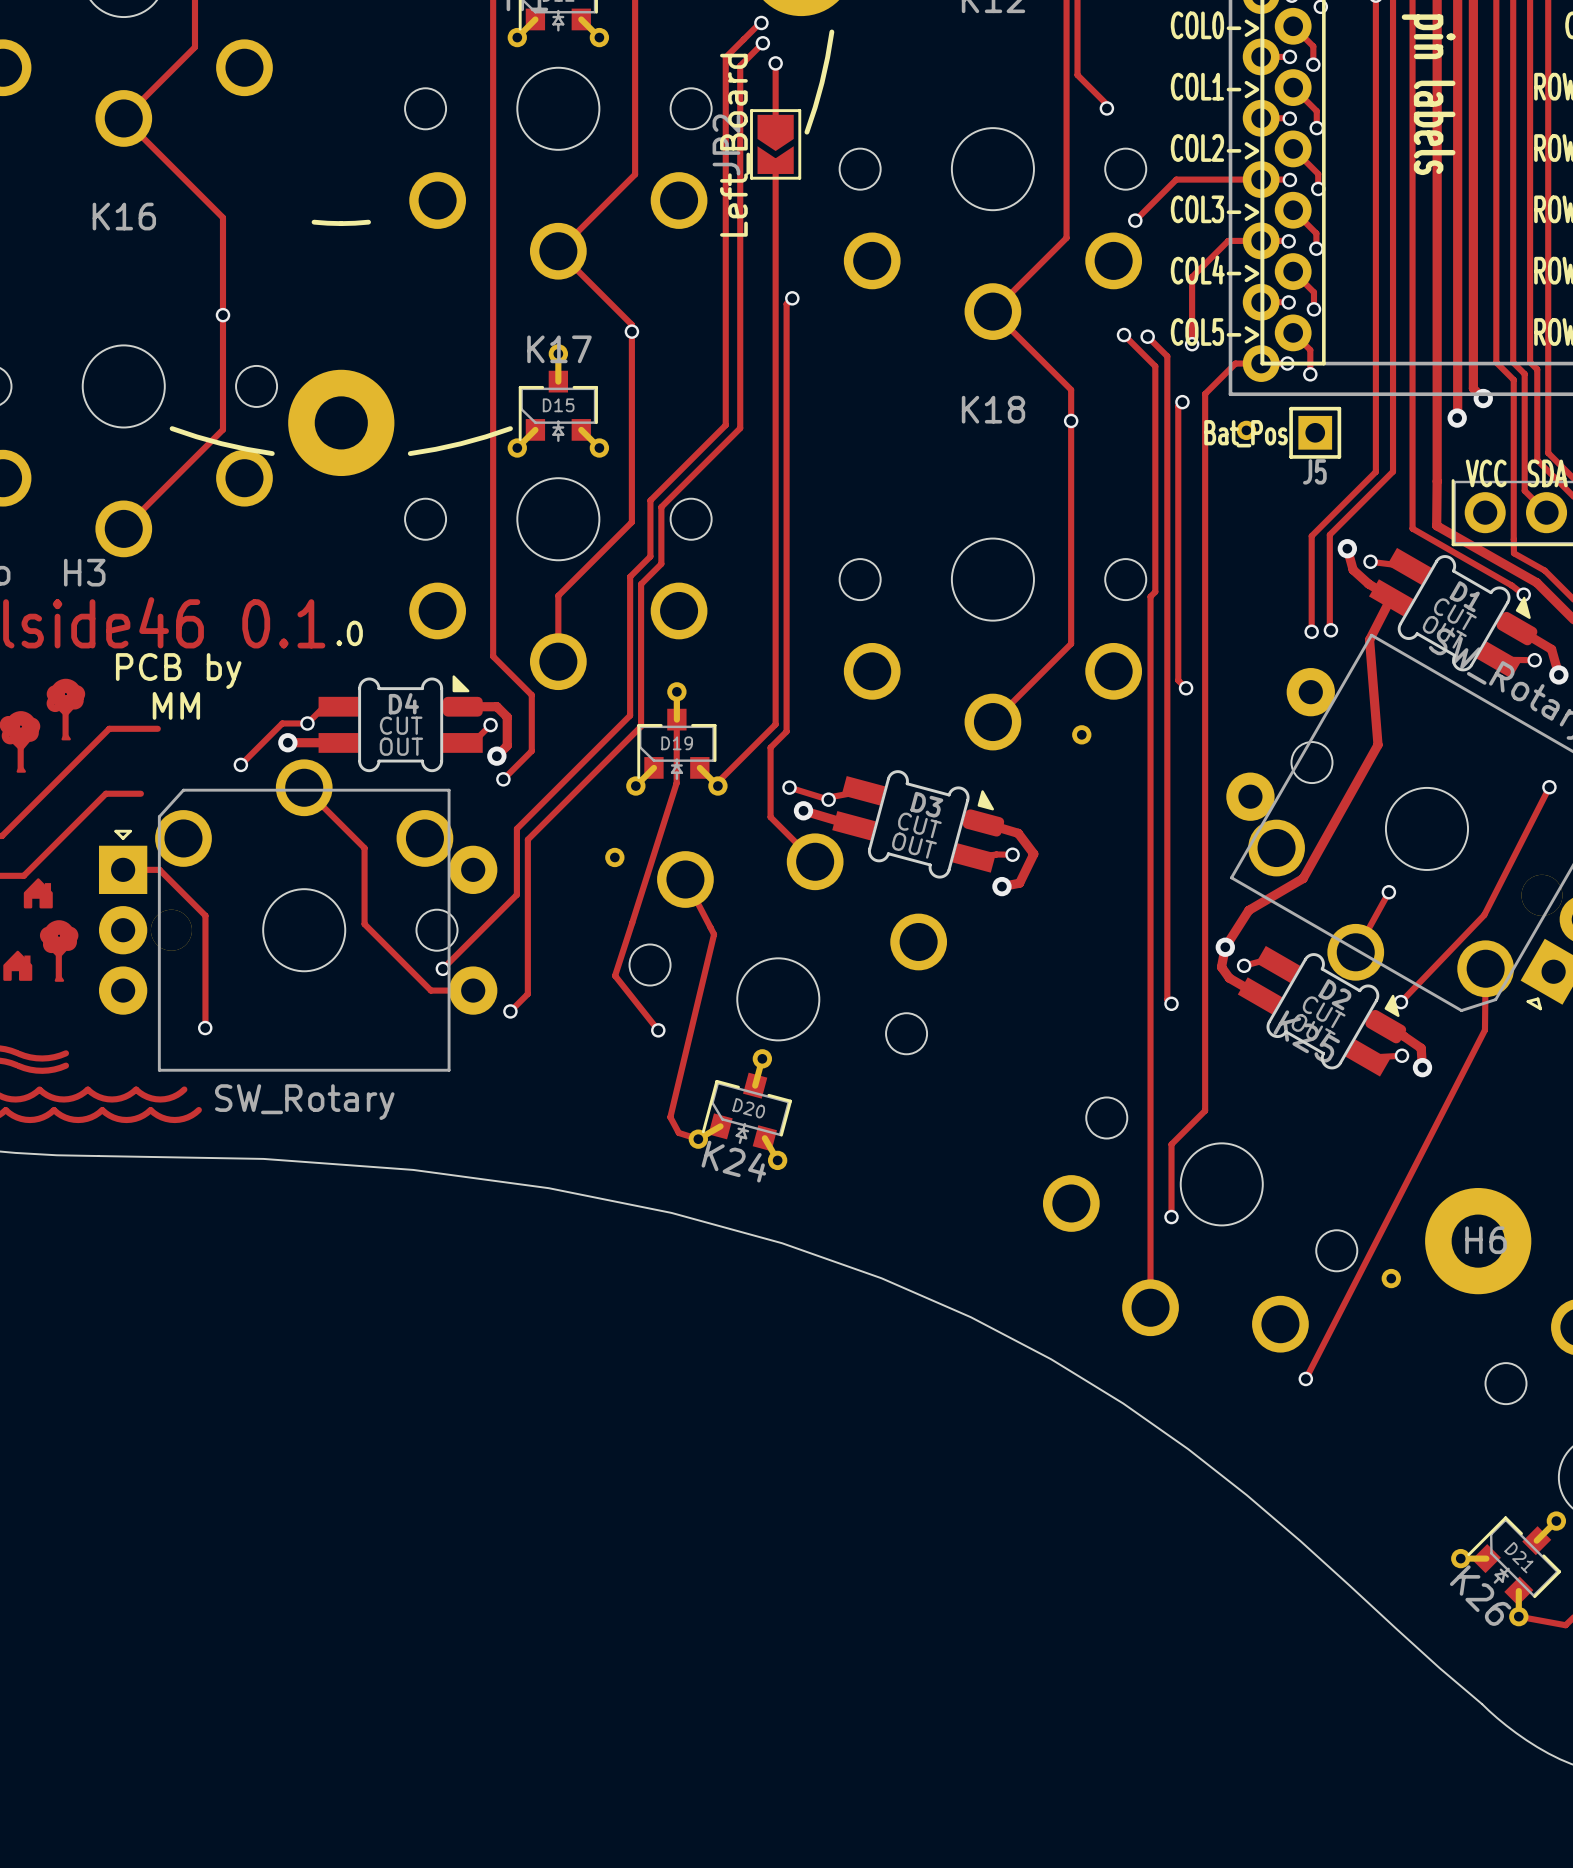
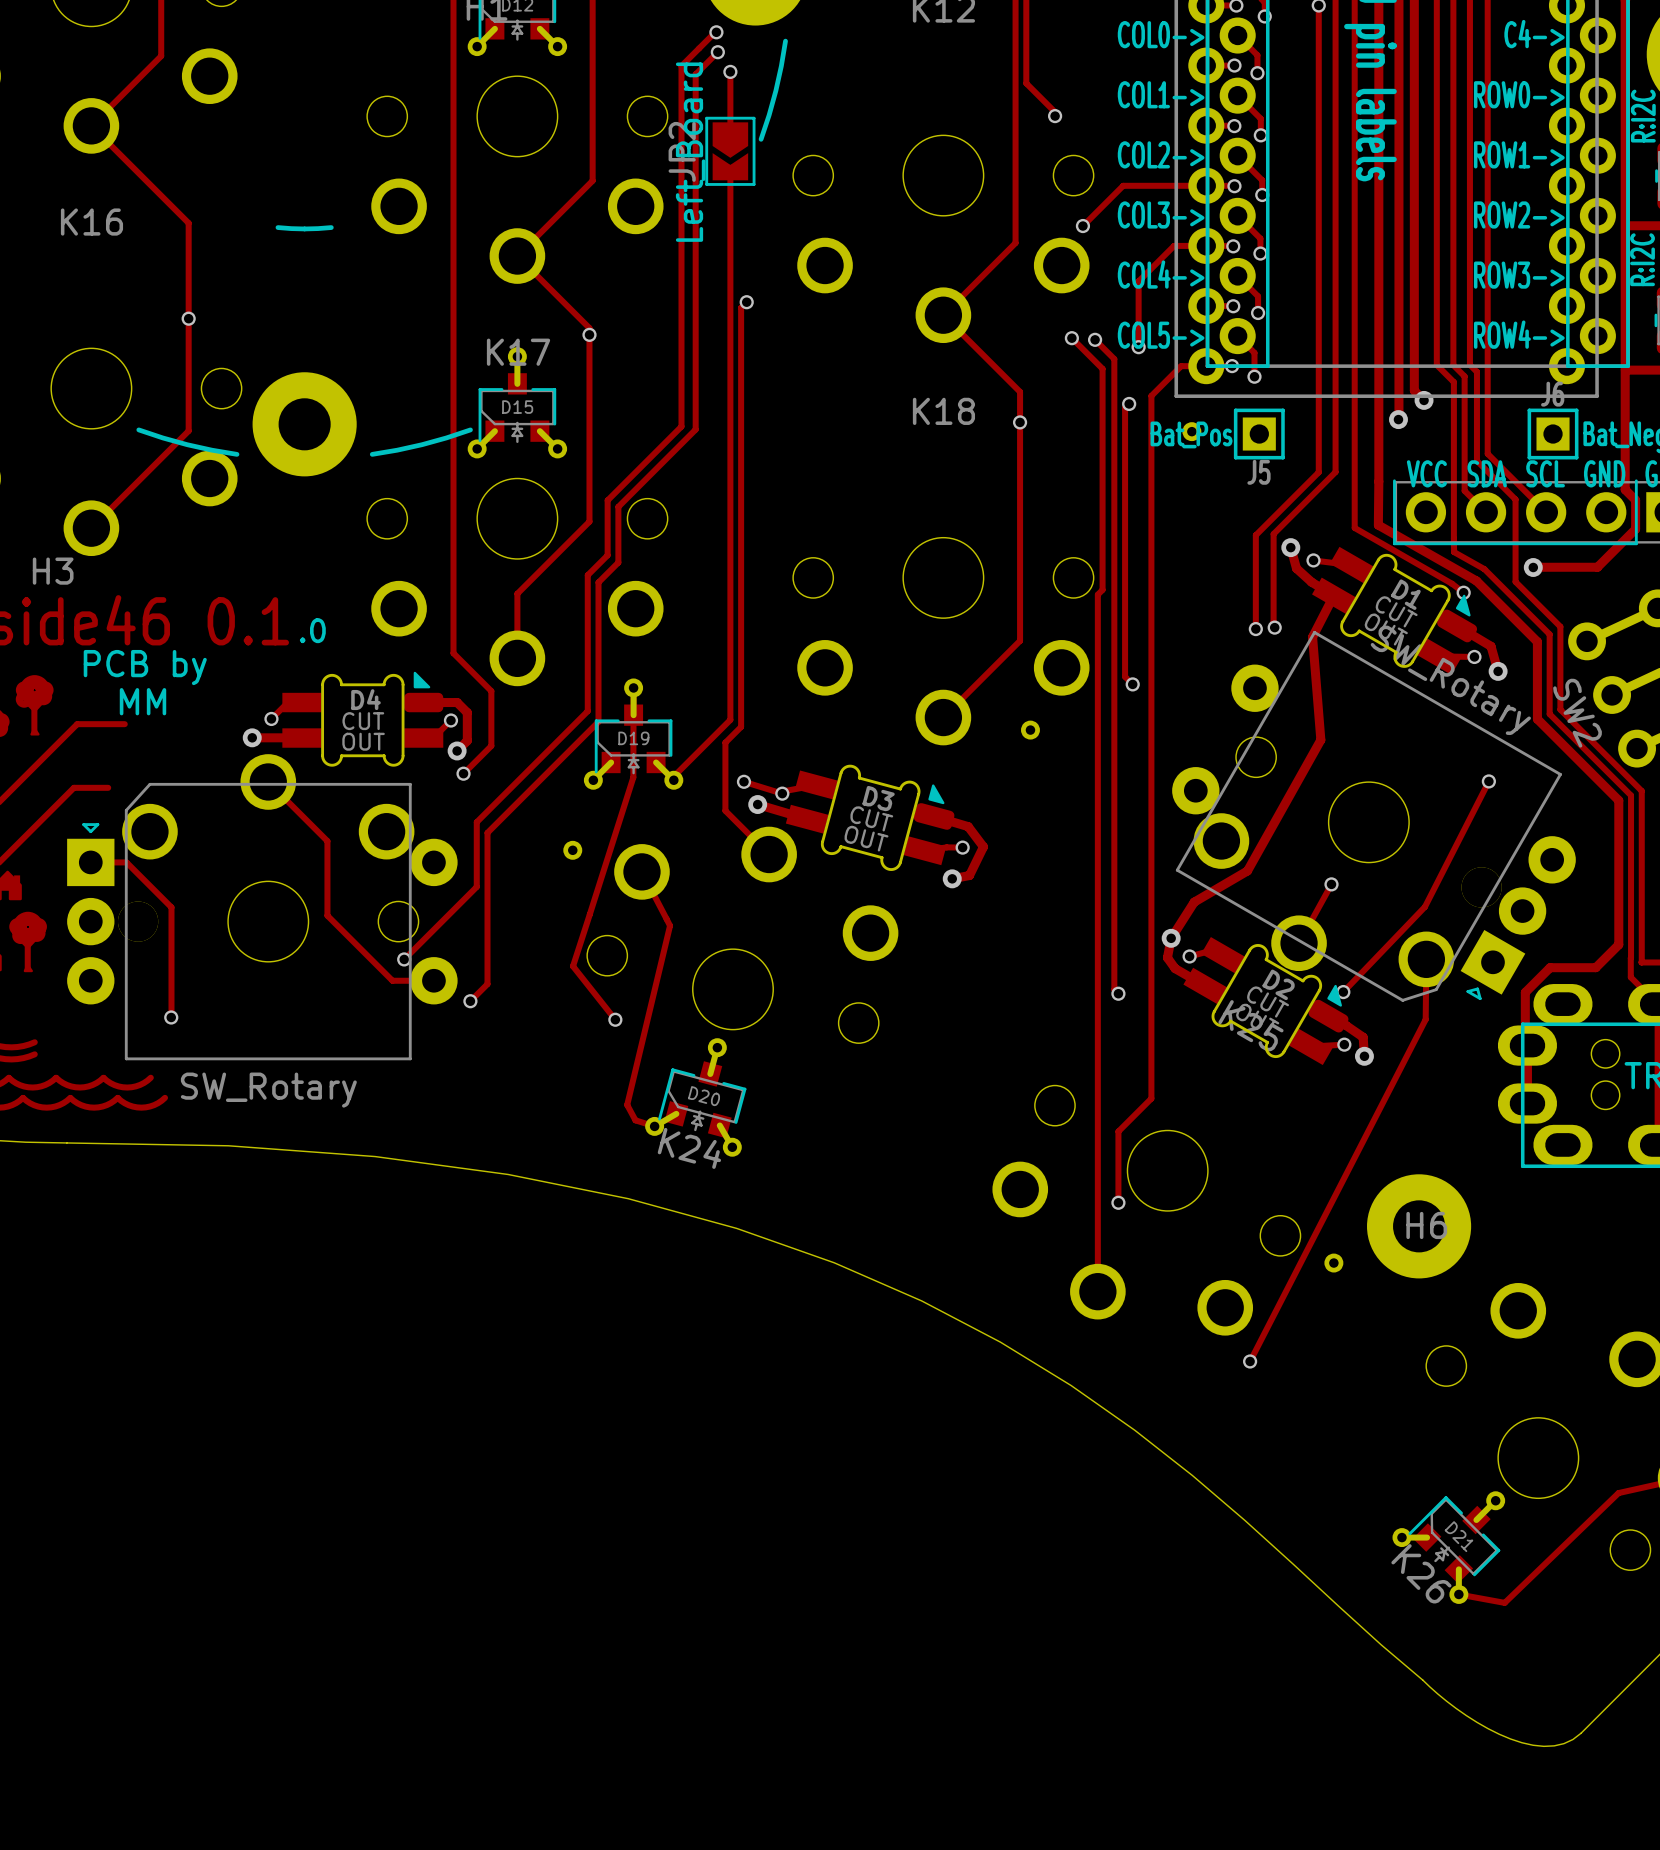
track: (307, 723) (282, 723) (240, 764) -> none
via: (240, 764) -> none

